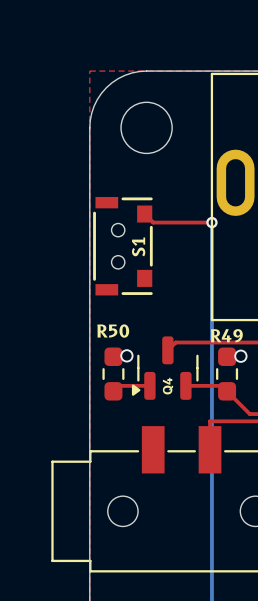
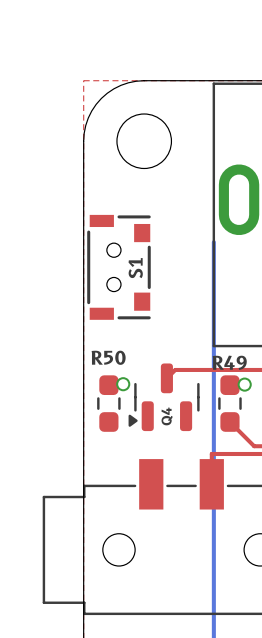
top track: (144, 214) (153, 222) (211, 222) -> none
via: (211, 222) -> none
top track: (118, 385) (149, 385) -> none
top track: (185, 385) (221, 385) -> none

